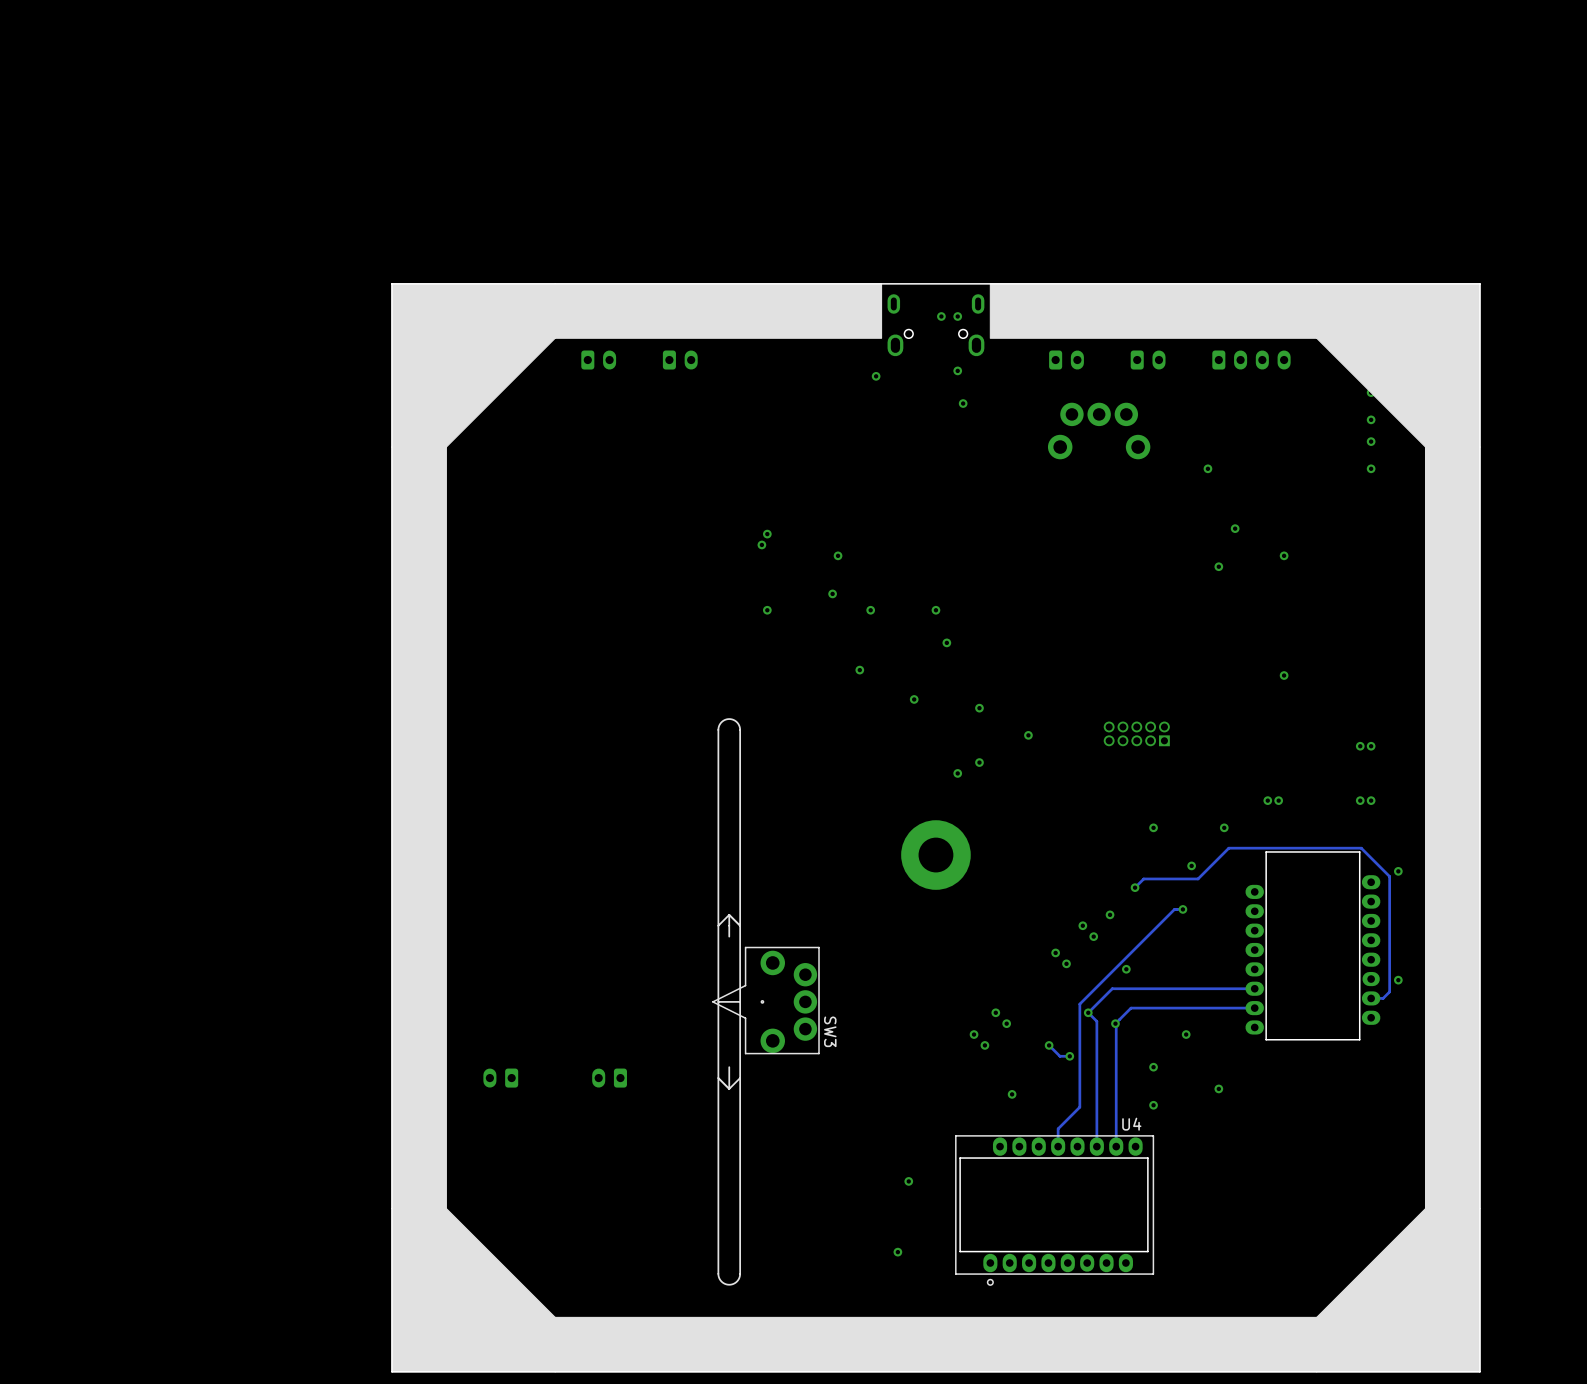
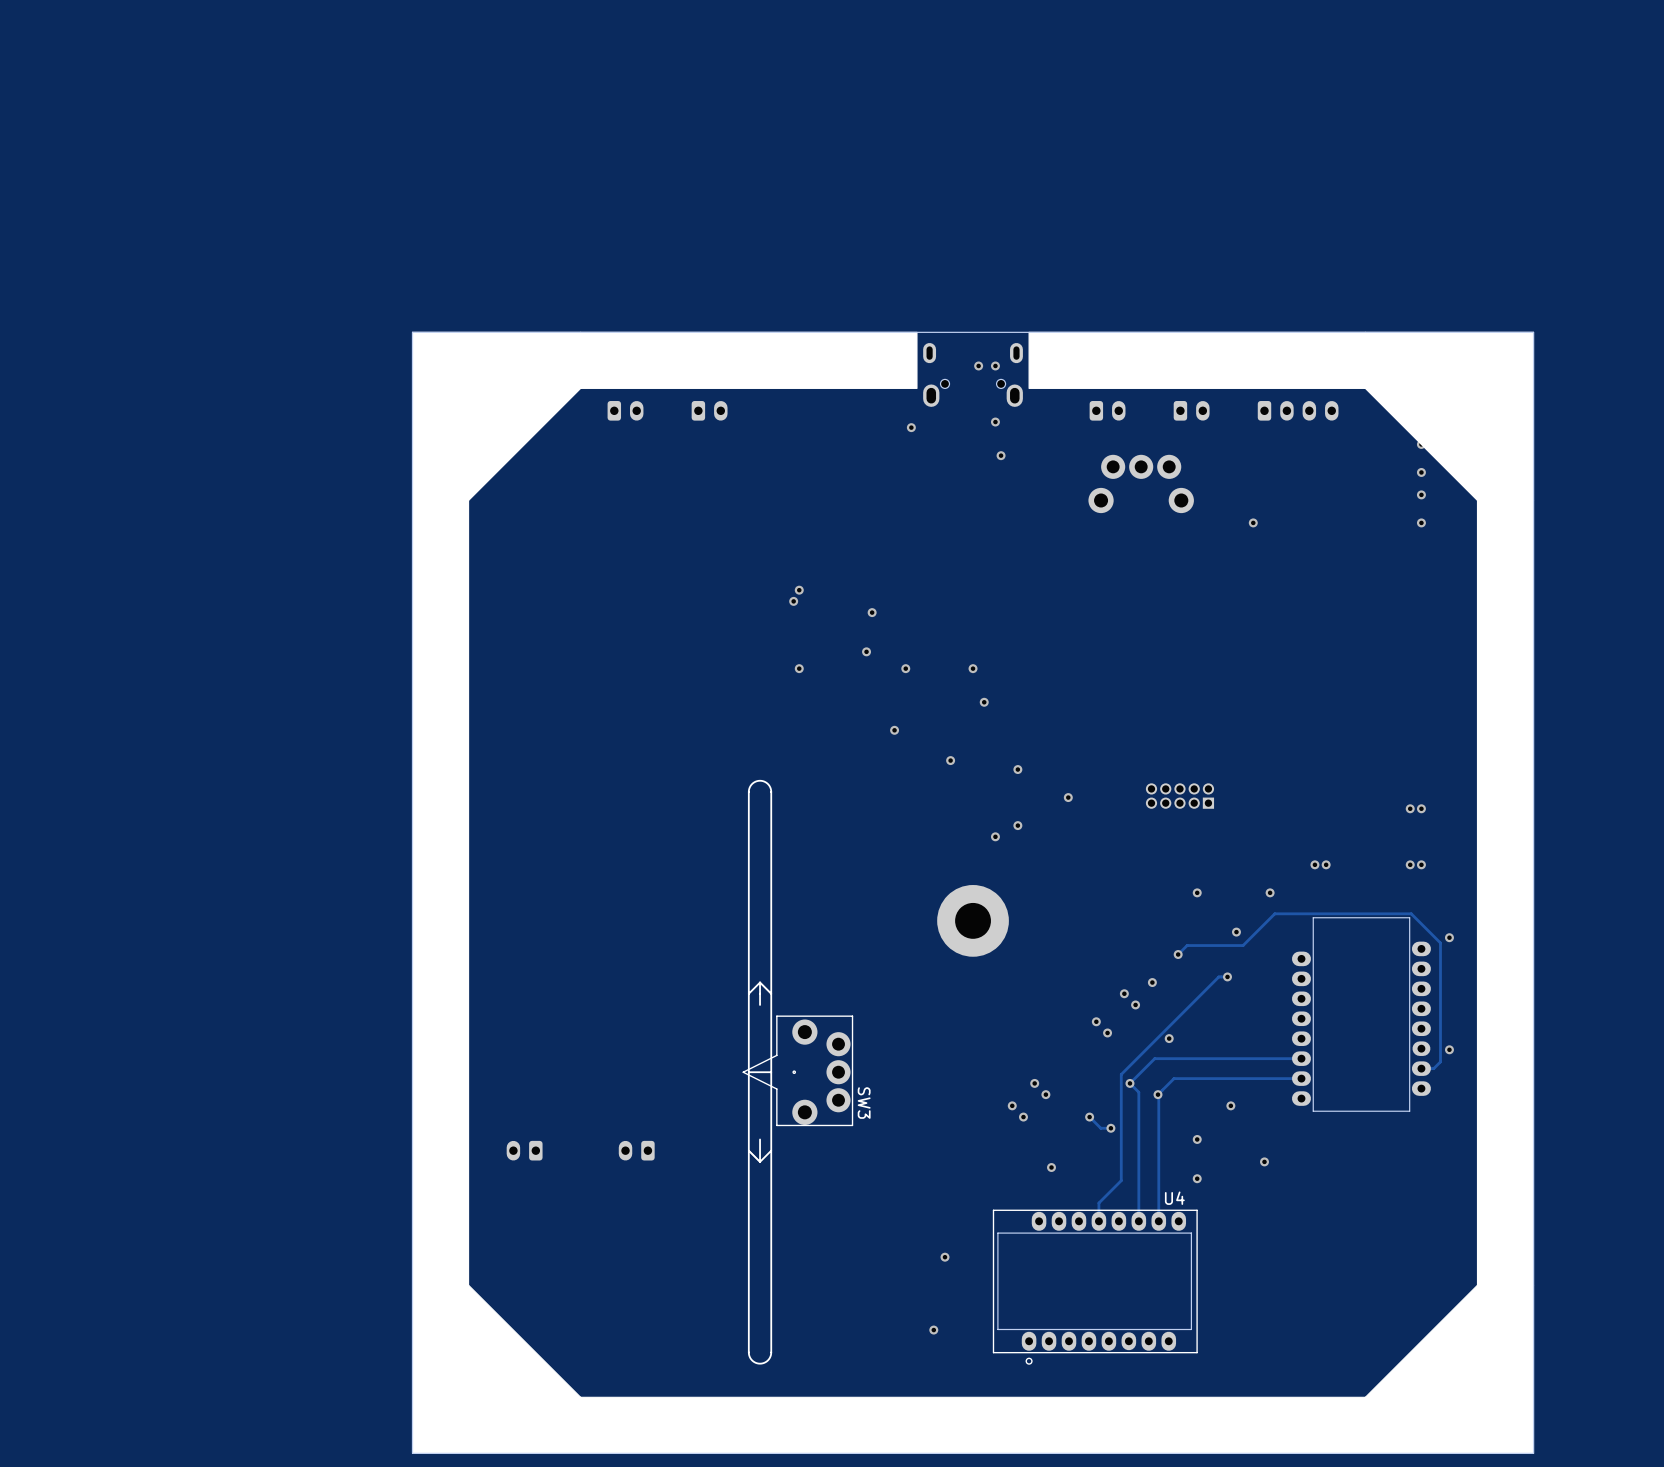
via: (1235, 528) -> none
via: (1284, 555) -> none
via: (1218, 566) -> none
via: (1284, 675) -> none

